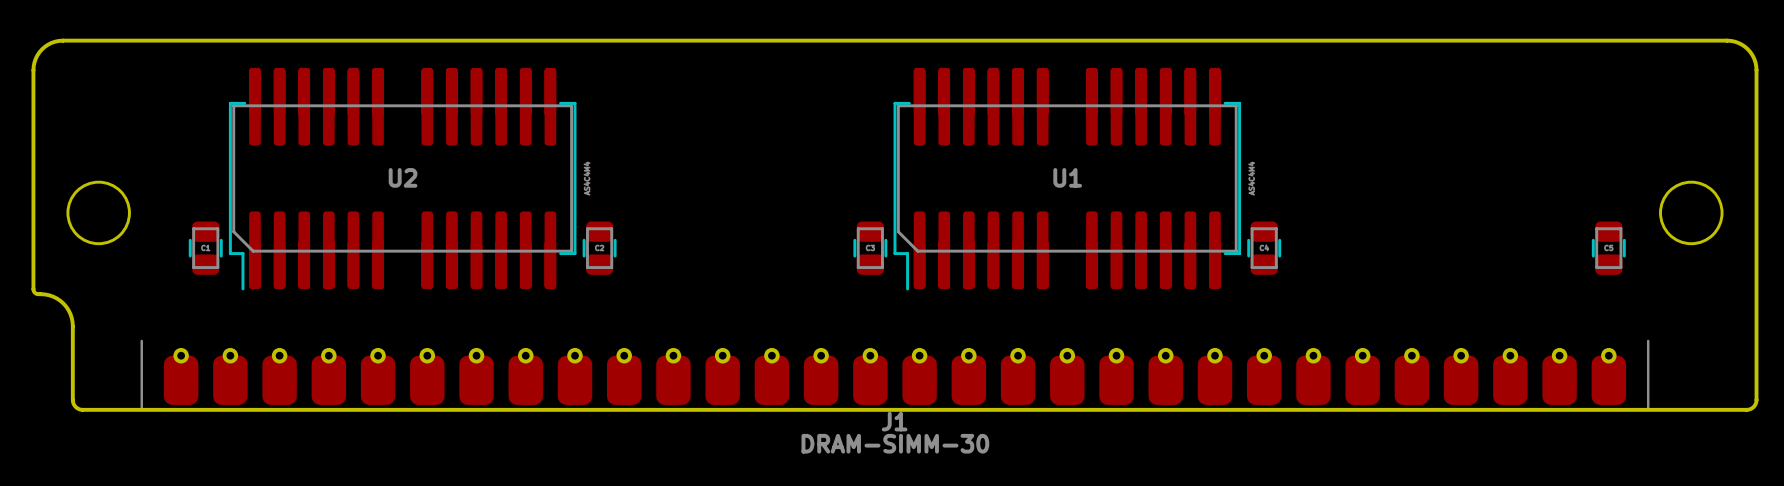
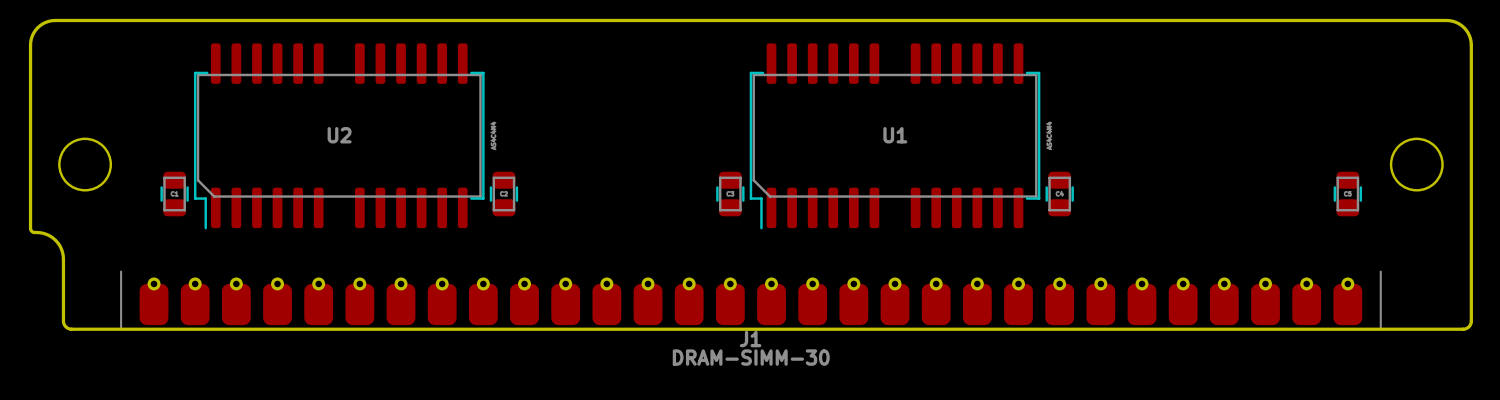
U2 footprint: [228, 68, 577, 291] -> [193, 43, 485, 230]
U1 footprint: [893, 68, 1242, 291] -> [749, 43, 1041, 230]

